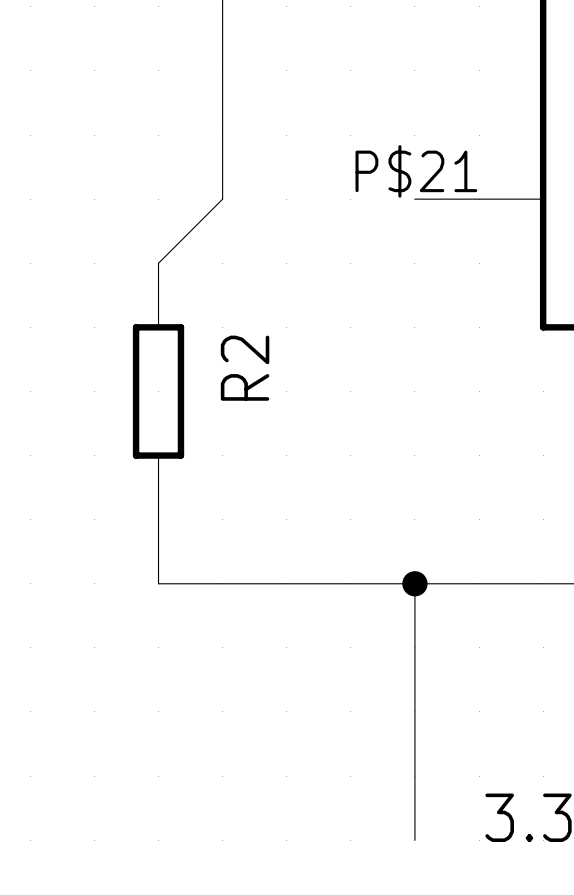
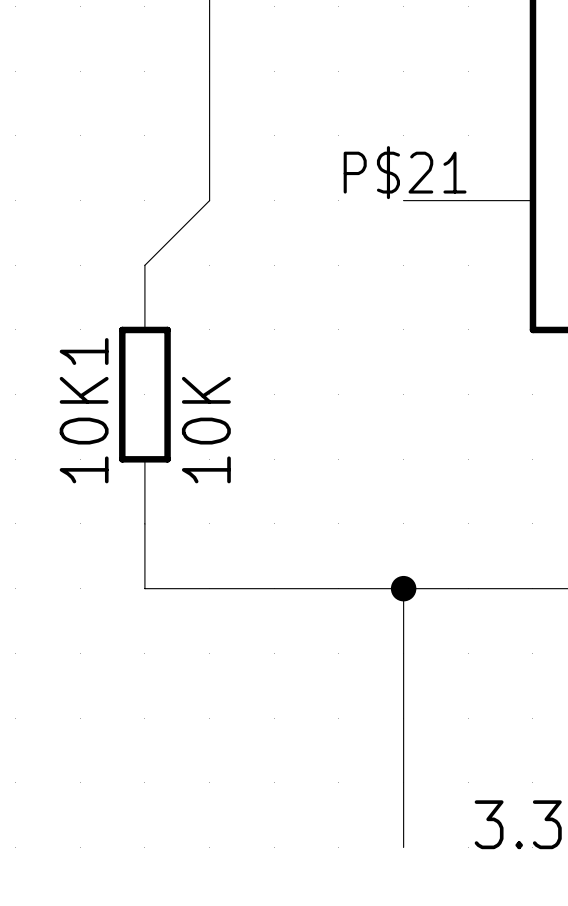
R2 name: R2 (245, 368) -> 10K1 (84, 410)
R2 value: none -> 10K (206, 430)

